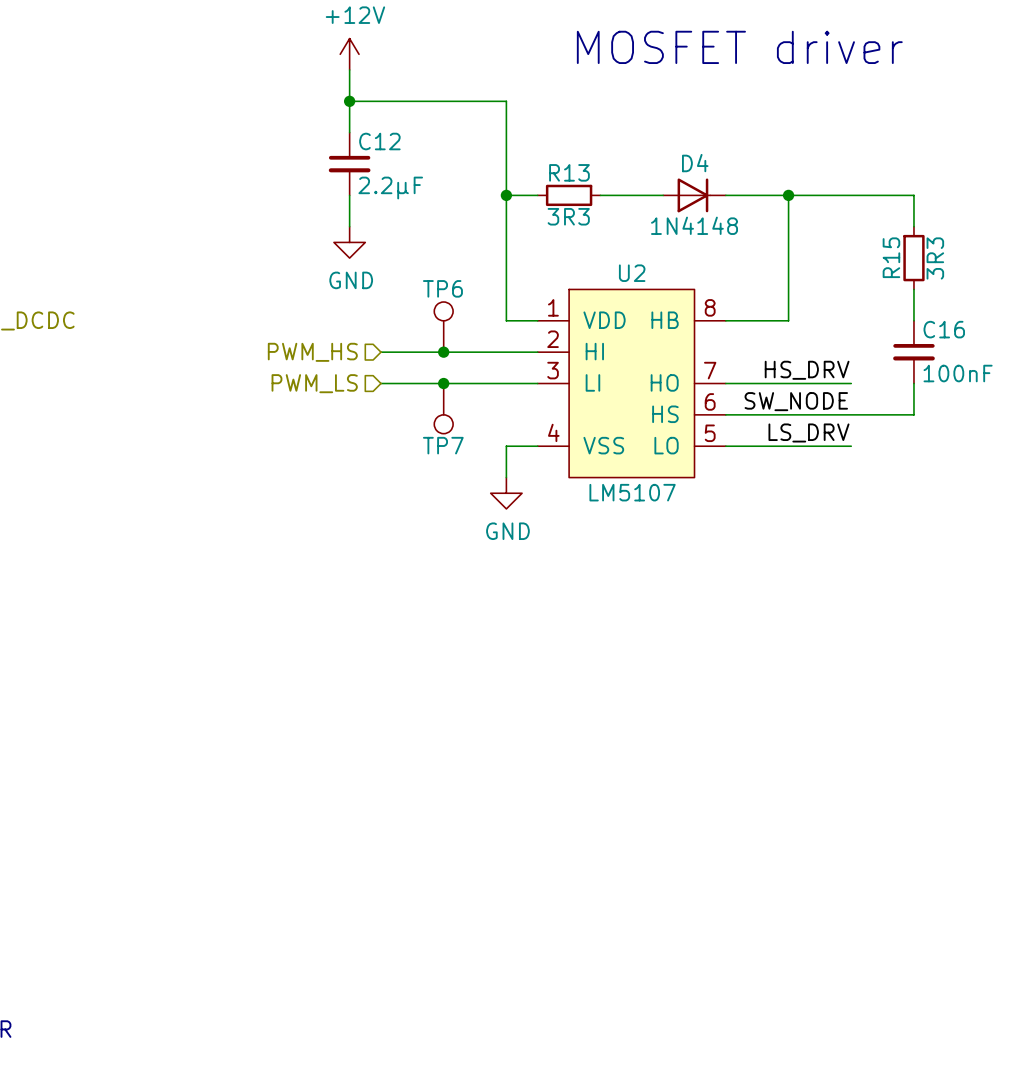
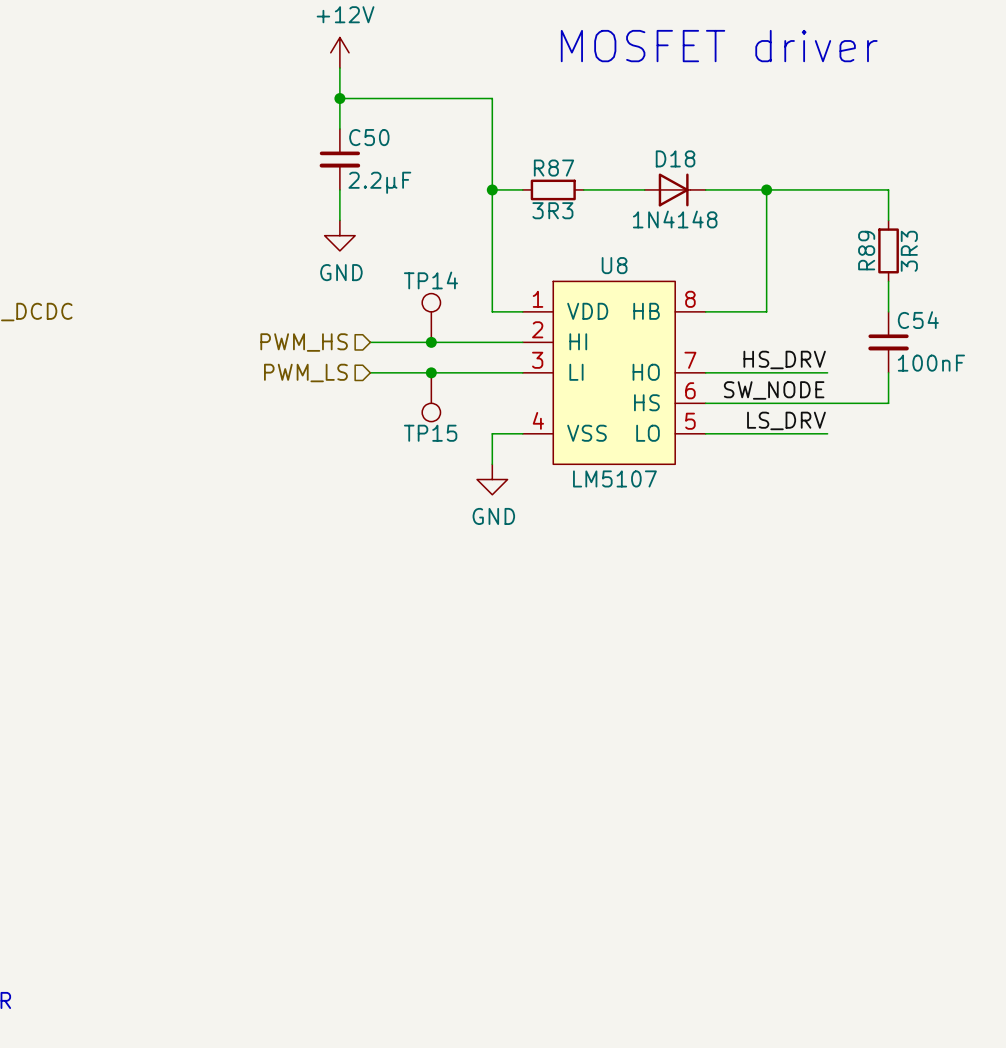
C12 name: C12 (379, 141) -> C50 (369, 137)
D4 name: D4 (695, 163) -> D18 (675, 158)
R13 name: R13 (569, 172) -> R87 (553, 168)
R15 name: R15 (891, 257) -> R89 (866, 250)
U2 name: U2 (632, 273) -> U8 (614, 265)
TP6 name: TP6 (442, 288) -> TP14 (430, 280)
C16 name: C16 (944, 329) -> C54 (918, 320)
TP7 name: TP7 (443, 445) -> TP15 (430, 433)

